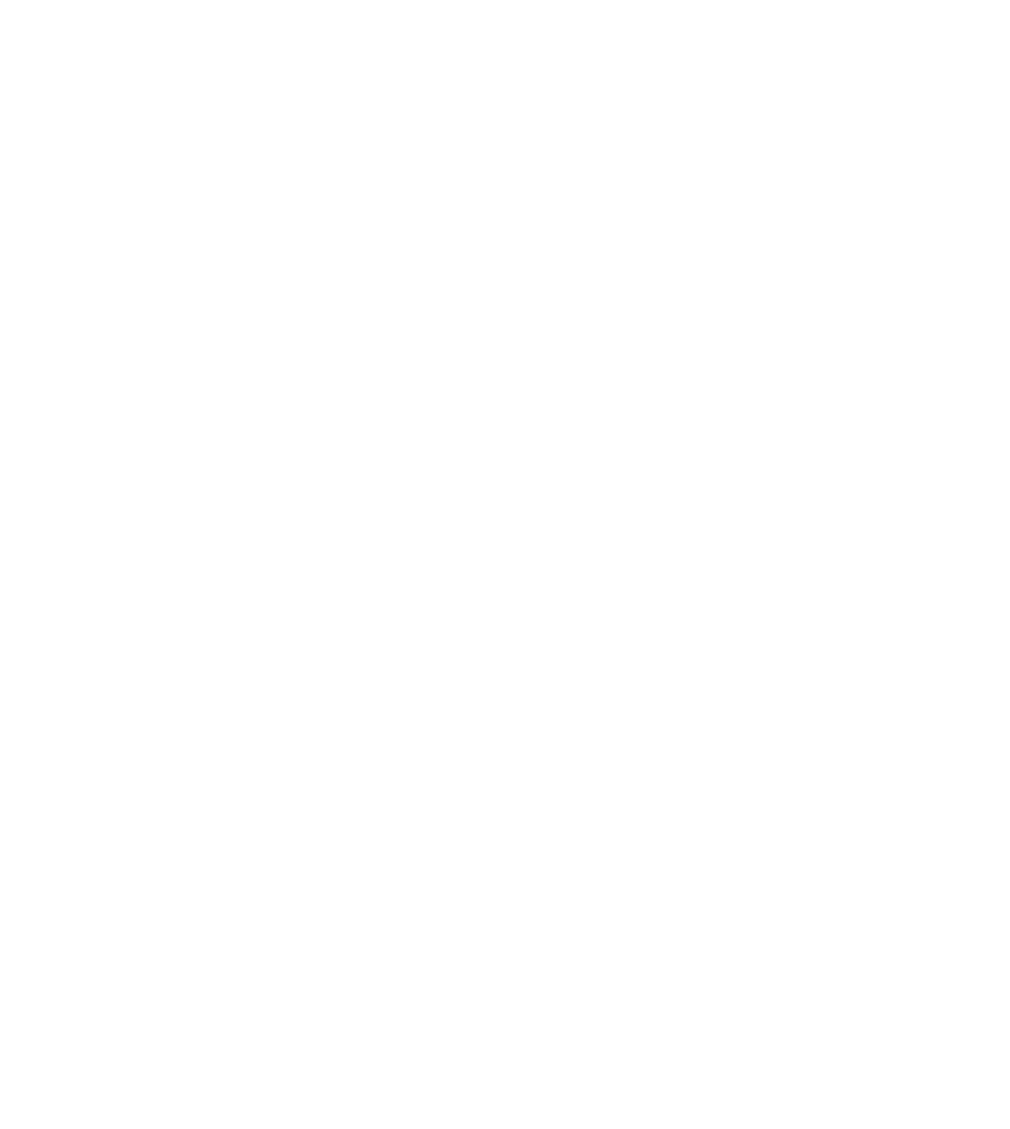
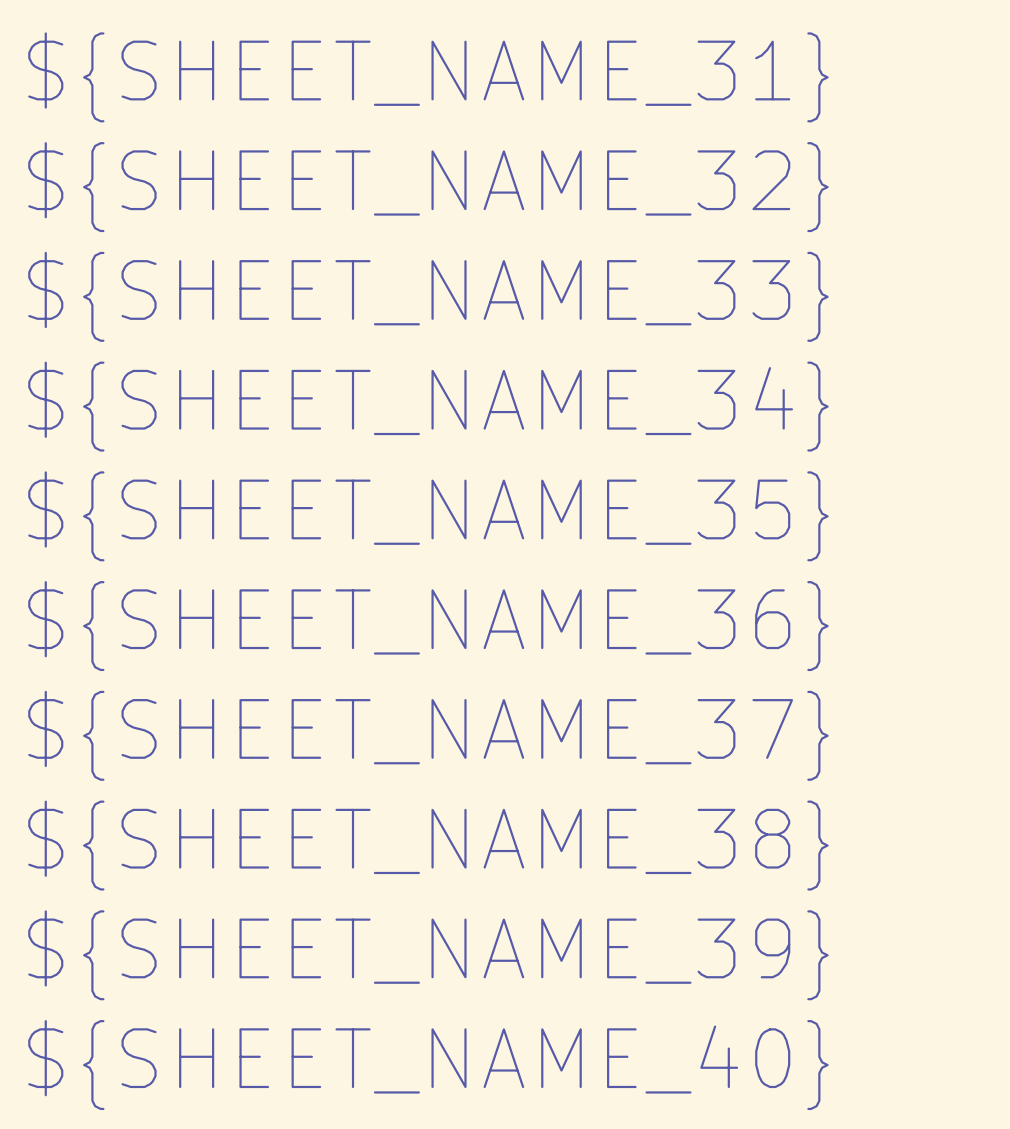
text: none -> ${SHEET_NAME_31} (428, 77)
text: none -> ${SHEET_NAME_32} (428, 187)
text: none -> ${SHEET_NAME_33} (428, 296)
text: none -> ${SHEET_NAME_34} (428, 406)
text: none -> ${SHEET_NAME_35} (428, 516)
text: none -> ${SHEET_NAME_36} (428, 626)
text: none -> ${SHEET_NAME_37} (428, 735)
text: none -> ${SHEET_NAME_38} (428, 845)
text: none -> ${SHEET_NAME_39} (428, 955)
text: none -> ${SHEET_NAME_40} (428, 1065)

